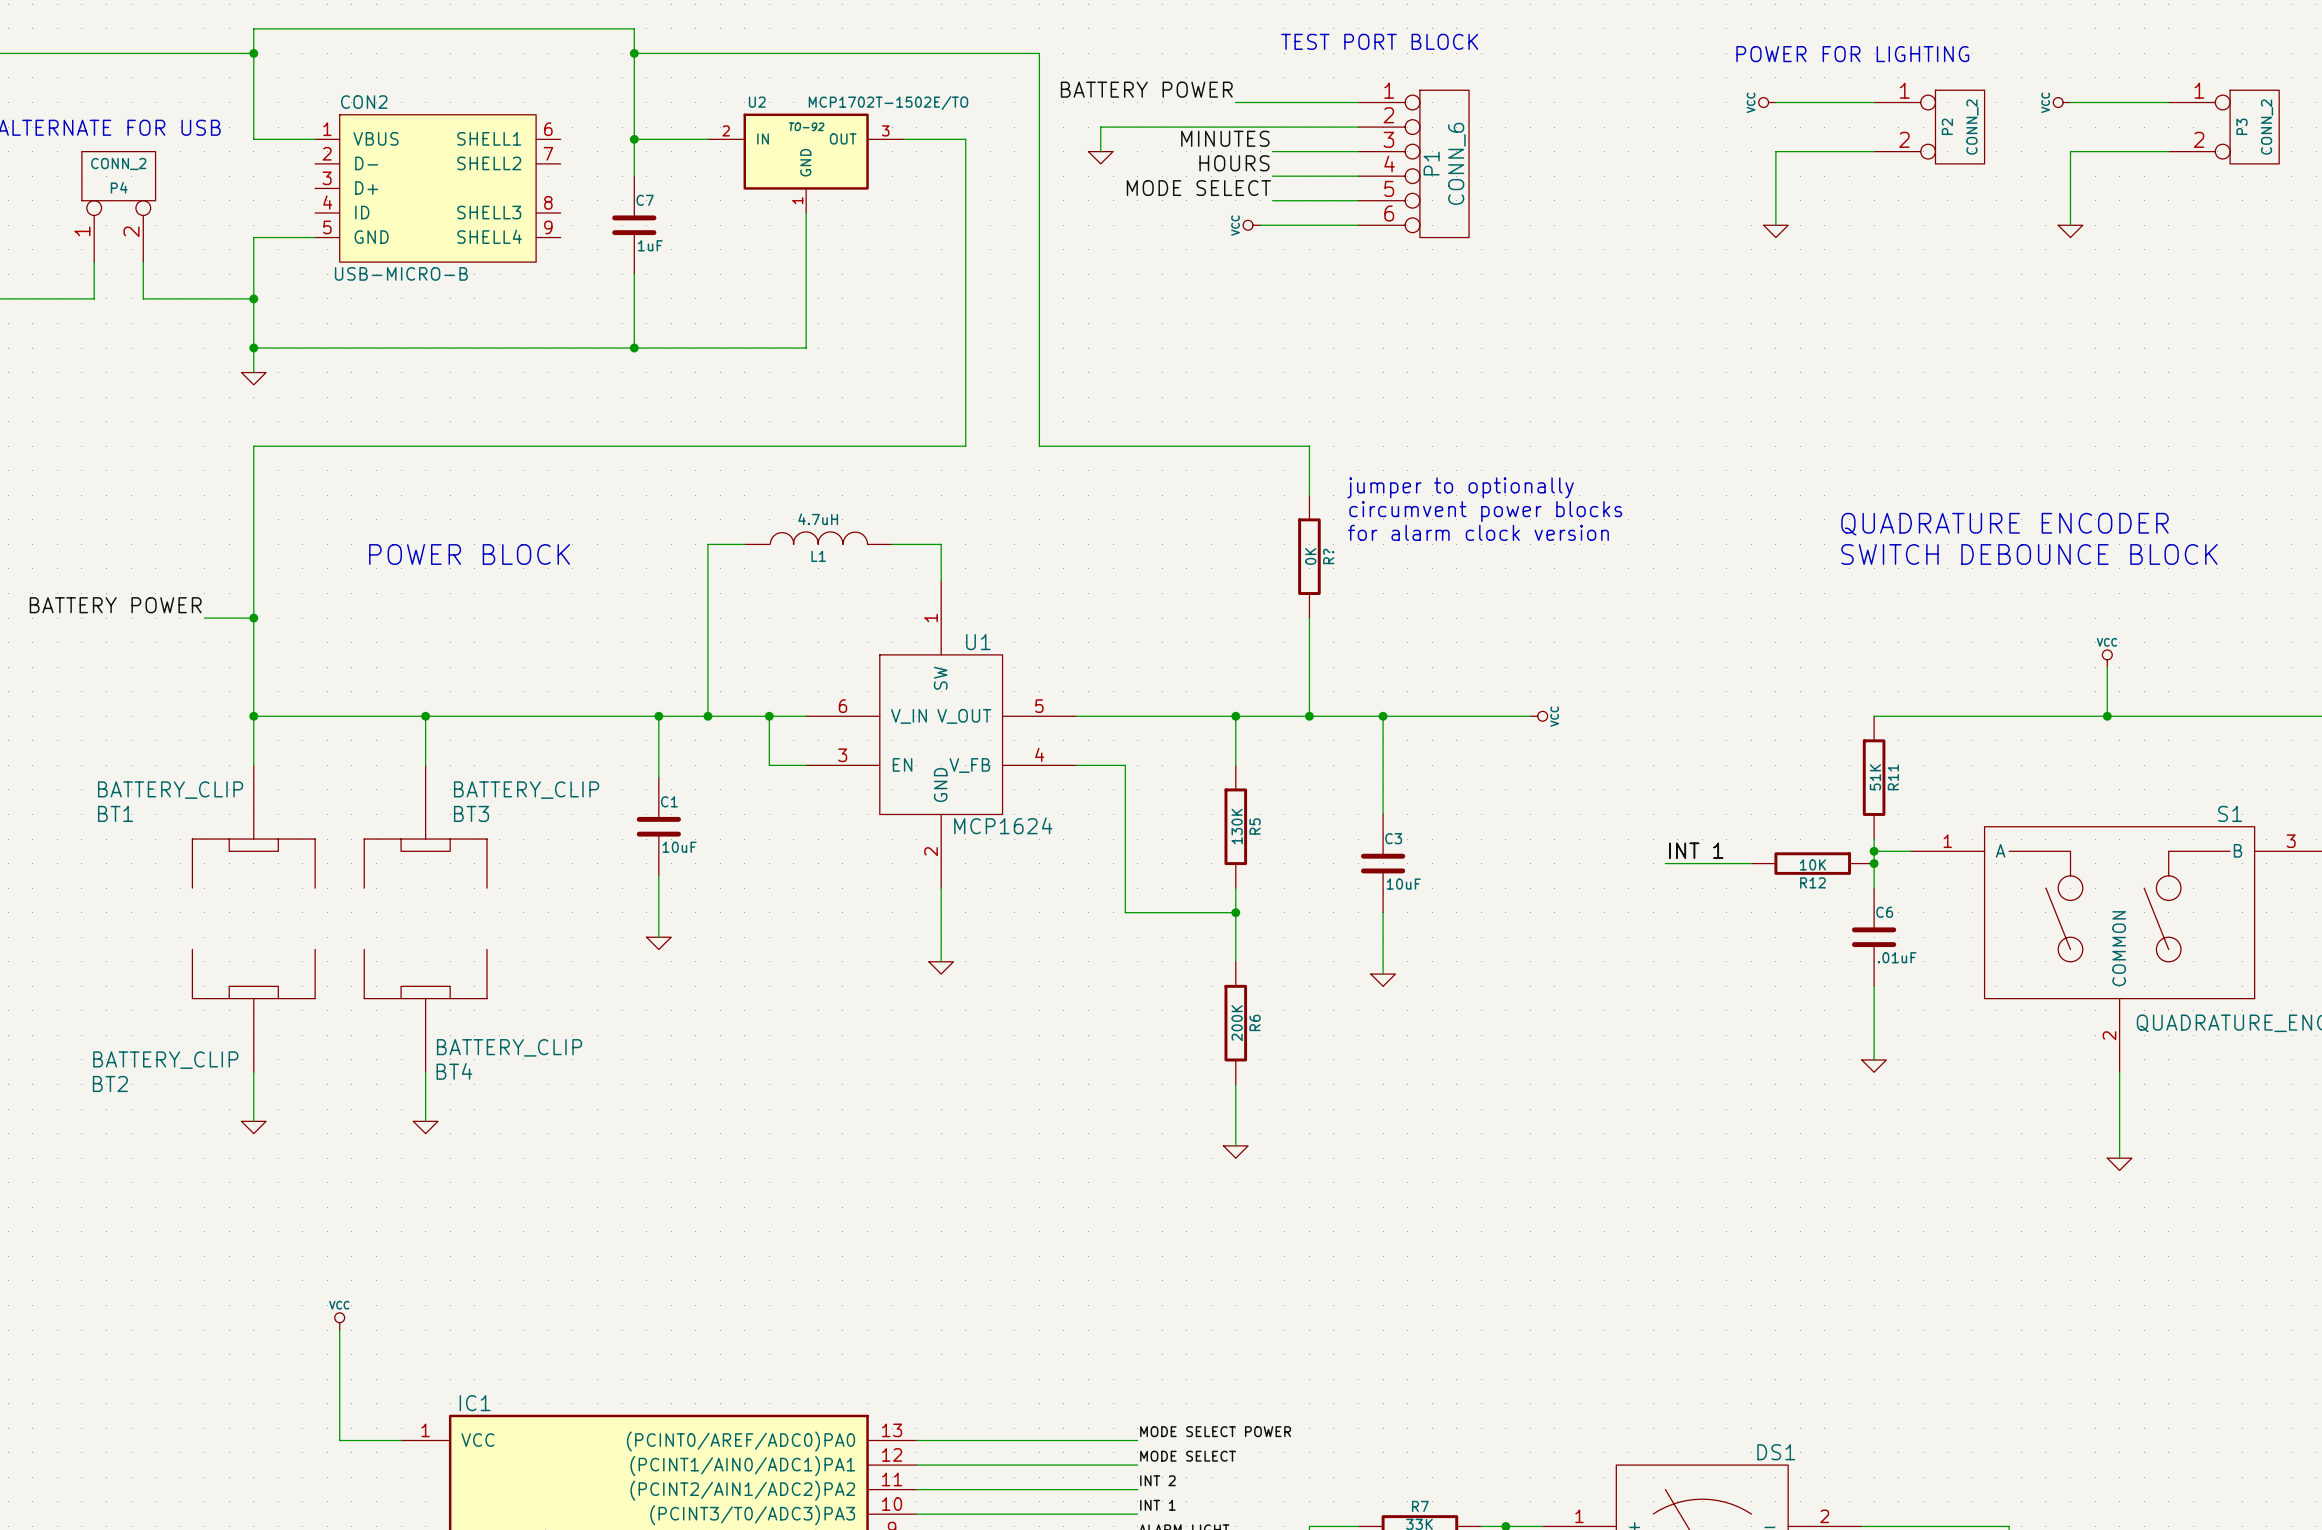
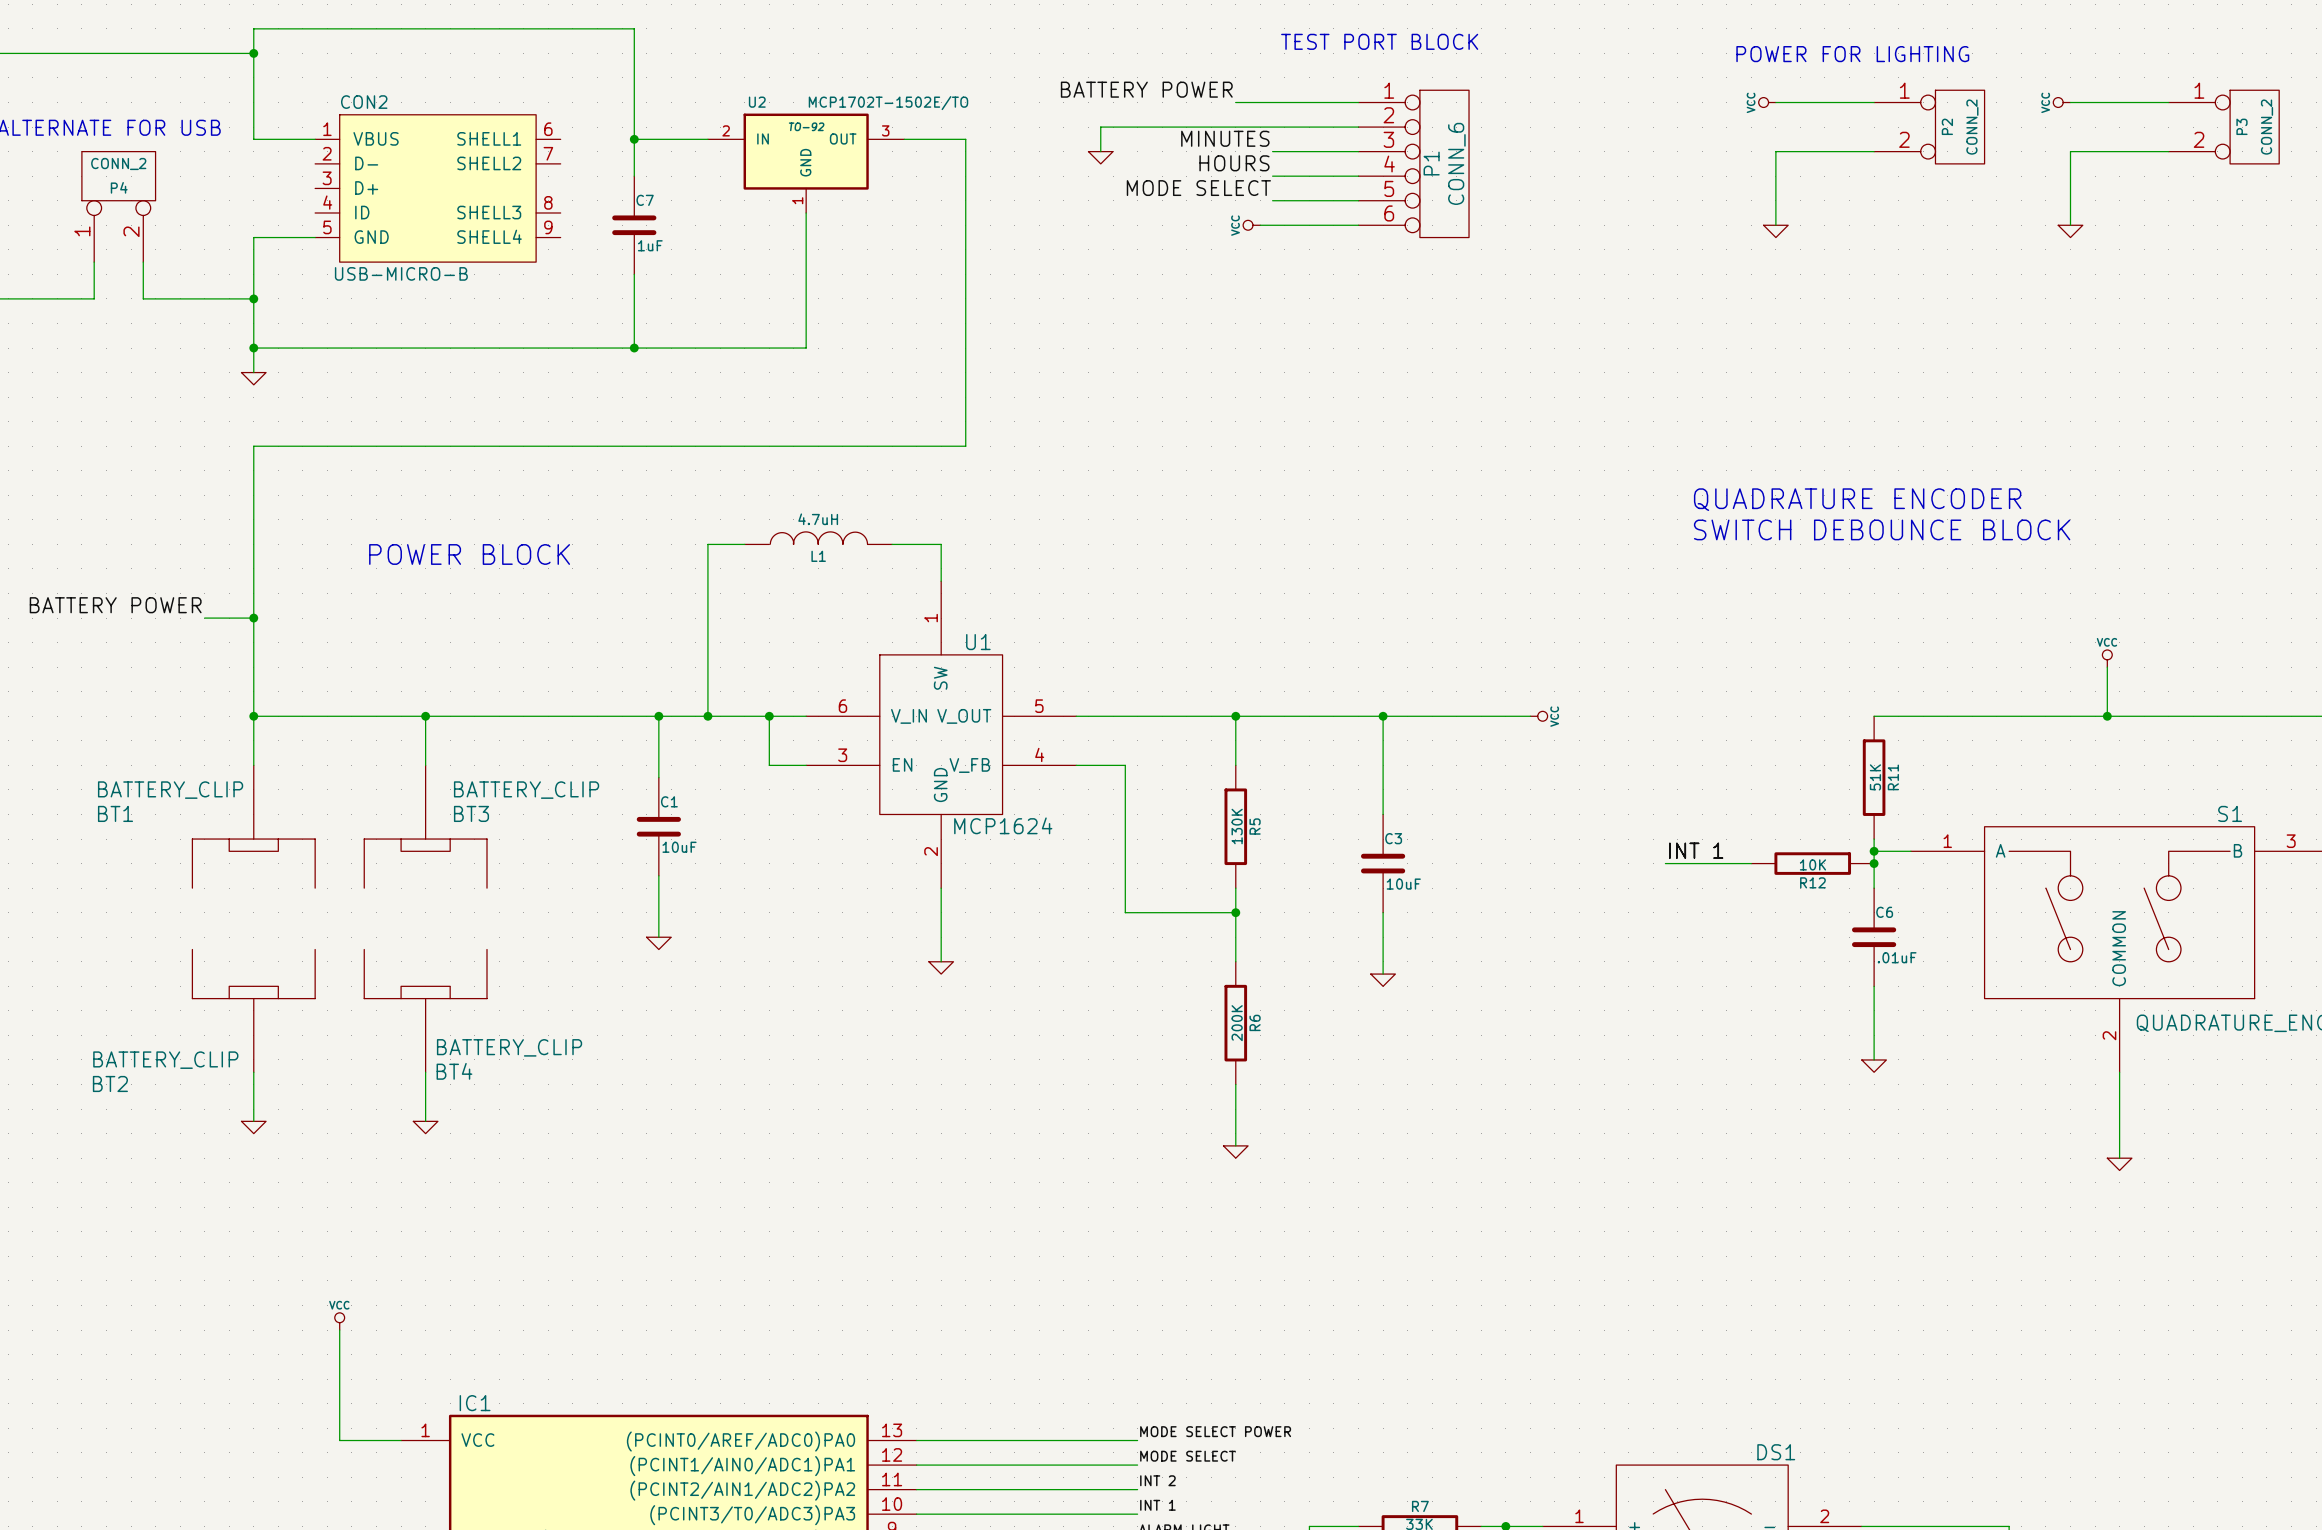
wire: (634, 53) (1039, 53) (1039, 446) (1309, 446) (1309, 495) -> none
junction: (634, 53) -> none
text: jumper to optionally (1460, 487) -> none
text: circumvent power blocks (1485, 511) -> none
text position: QUADRATURE ENCODER (2004, 524) -> QUADRATURE ENCODER (1857, 499)
text: for alarm clock version (1478, 532) -> none
text position: SWITCH DEBOUNCE BLOCK (2029, 554) -> SWITCH DEBOUNCE BLOCK (1882, 529)
R?: 0K (1309, 556) -> none
wire: (1309, 618) (1309, 716) -> none
junction: (1309, 716) -> none

